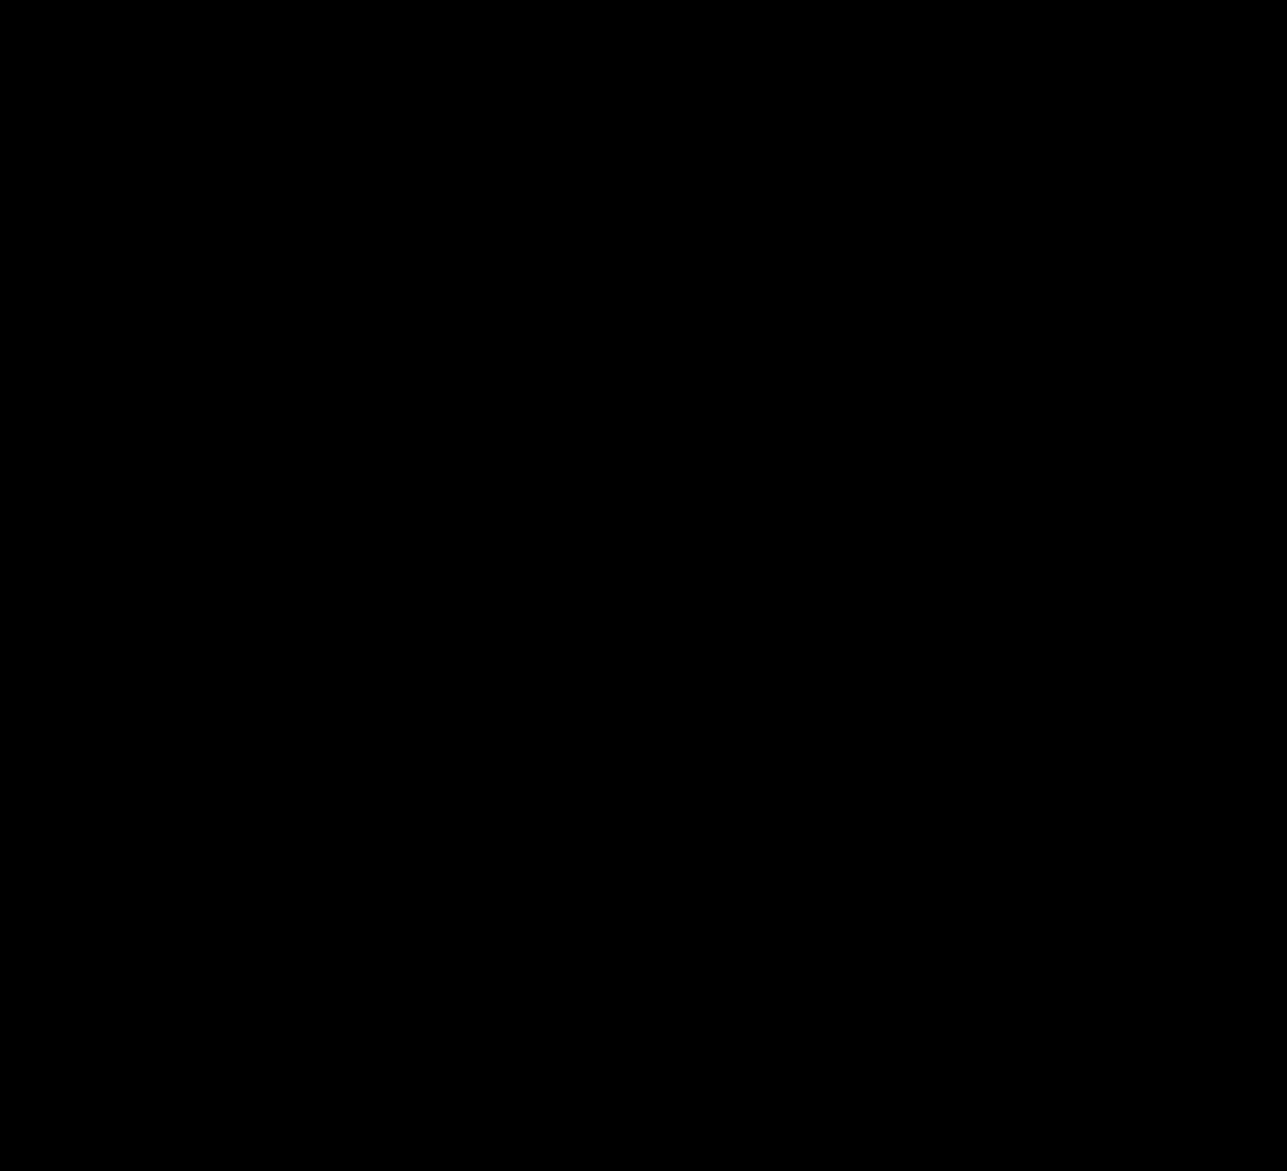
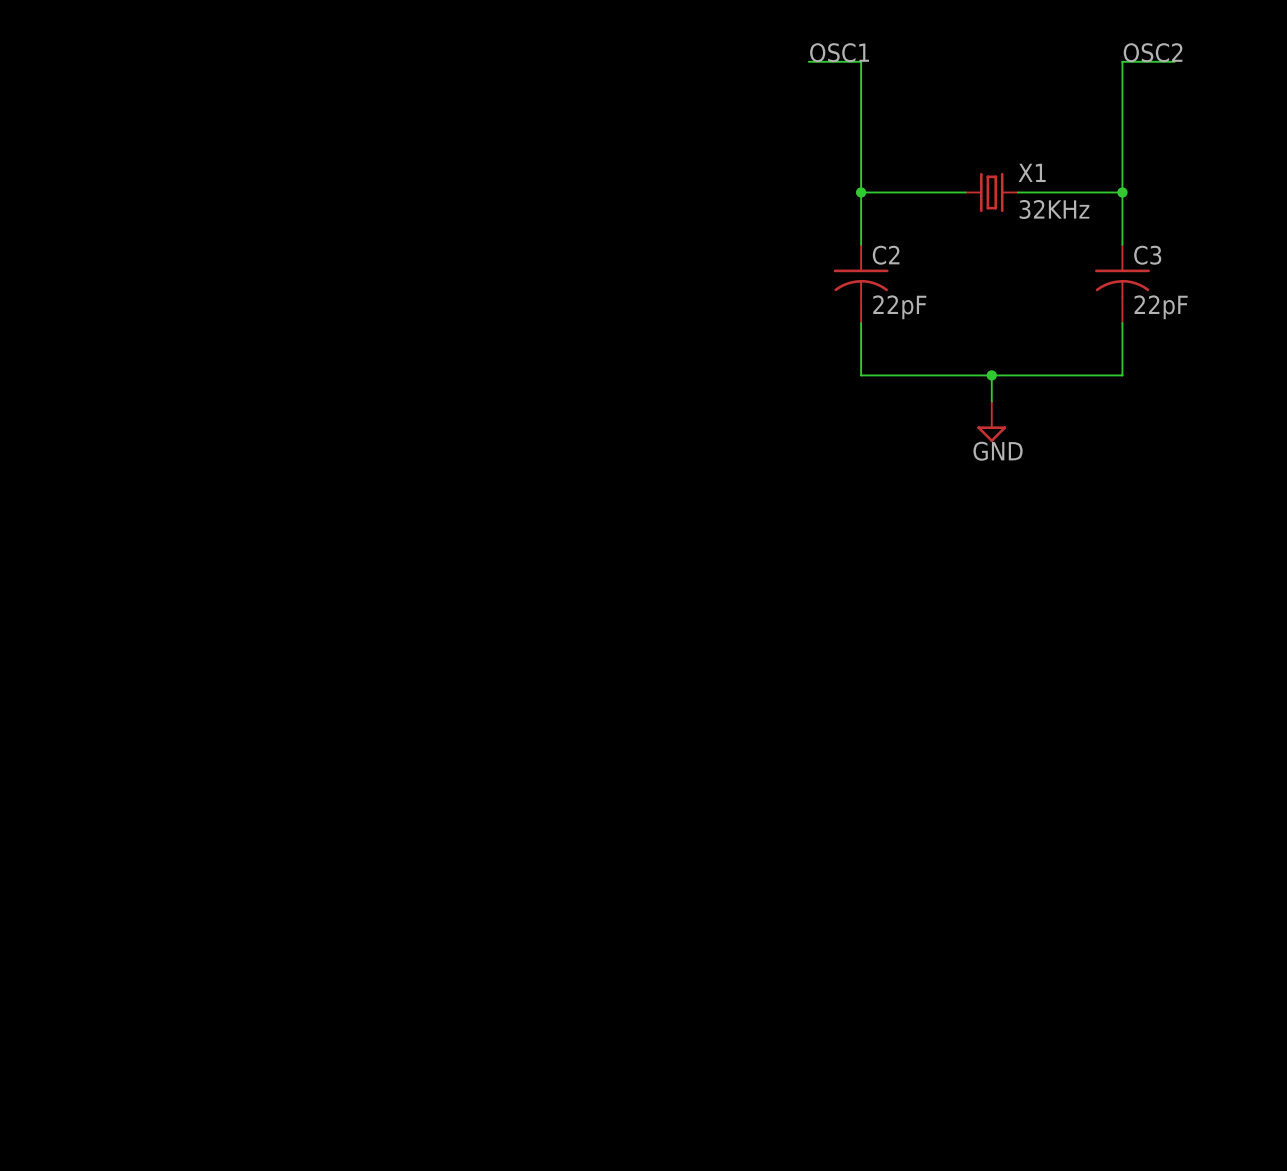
label: none -> OSC1 (839, 52)
label: none -> OSC2 (1153, 52)
wire: none -> (808, 61) (861, 61) (861, 244)
wire: none -> (1174, 61) (1122, 61) (1122, 244)
wire: none -> (861, 192) (965, 192)
junction: none -> (861, 192)
X1: none -> 32KHz (991, 192)
wire: none -> (1017, 192) (1122, 192)
junction: none -> (1122, 192)
C2: none -> 22pF (861, 283)
C3: none -> 22pF (1122, 283)
wire: none -> (861, 323) (861, 375) (1122, 375) (1122, 323)
wire: none -> (991, 375) (991, 401)
junction: none -> (991, 375)
power symbol: none -> GND (991, 421)

